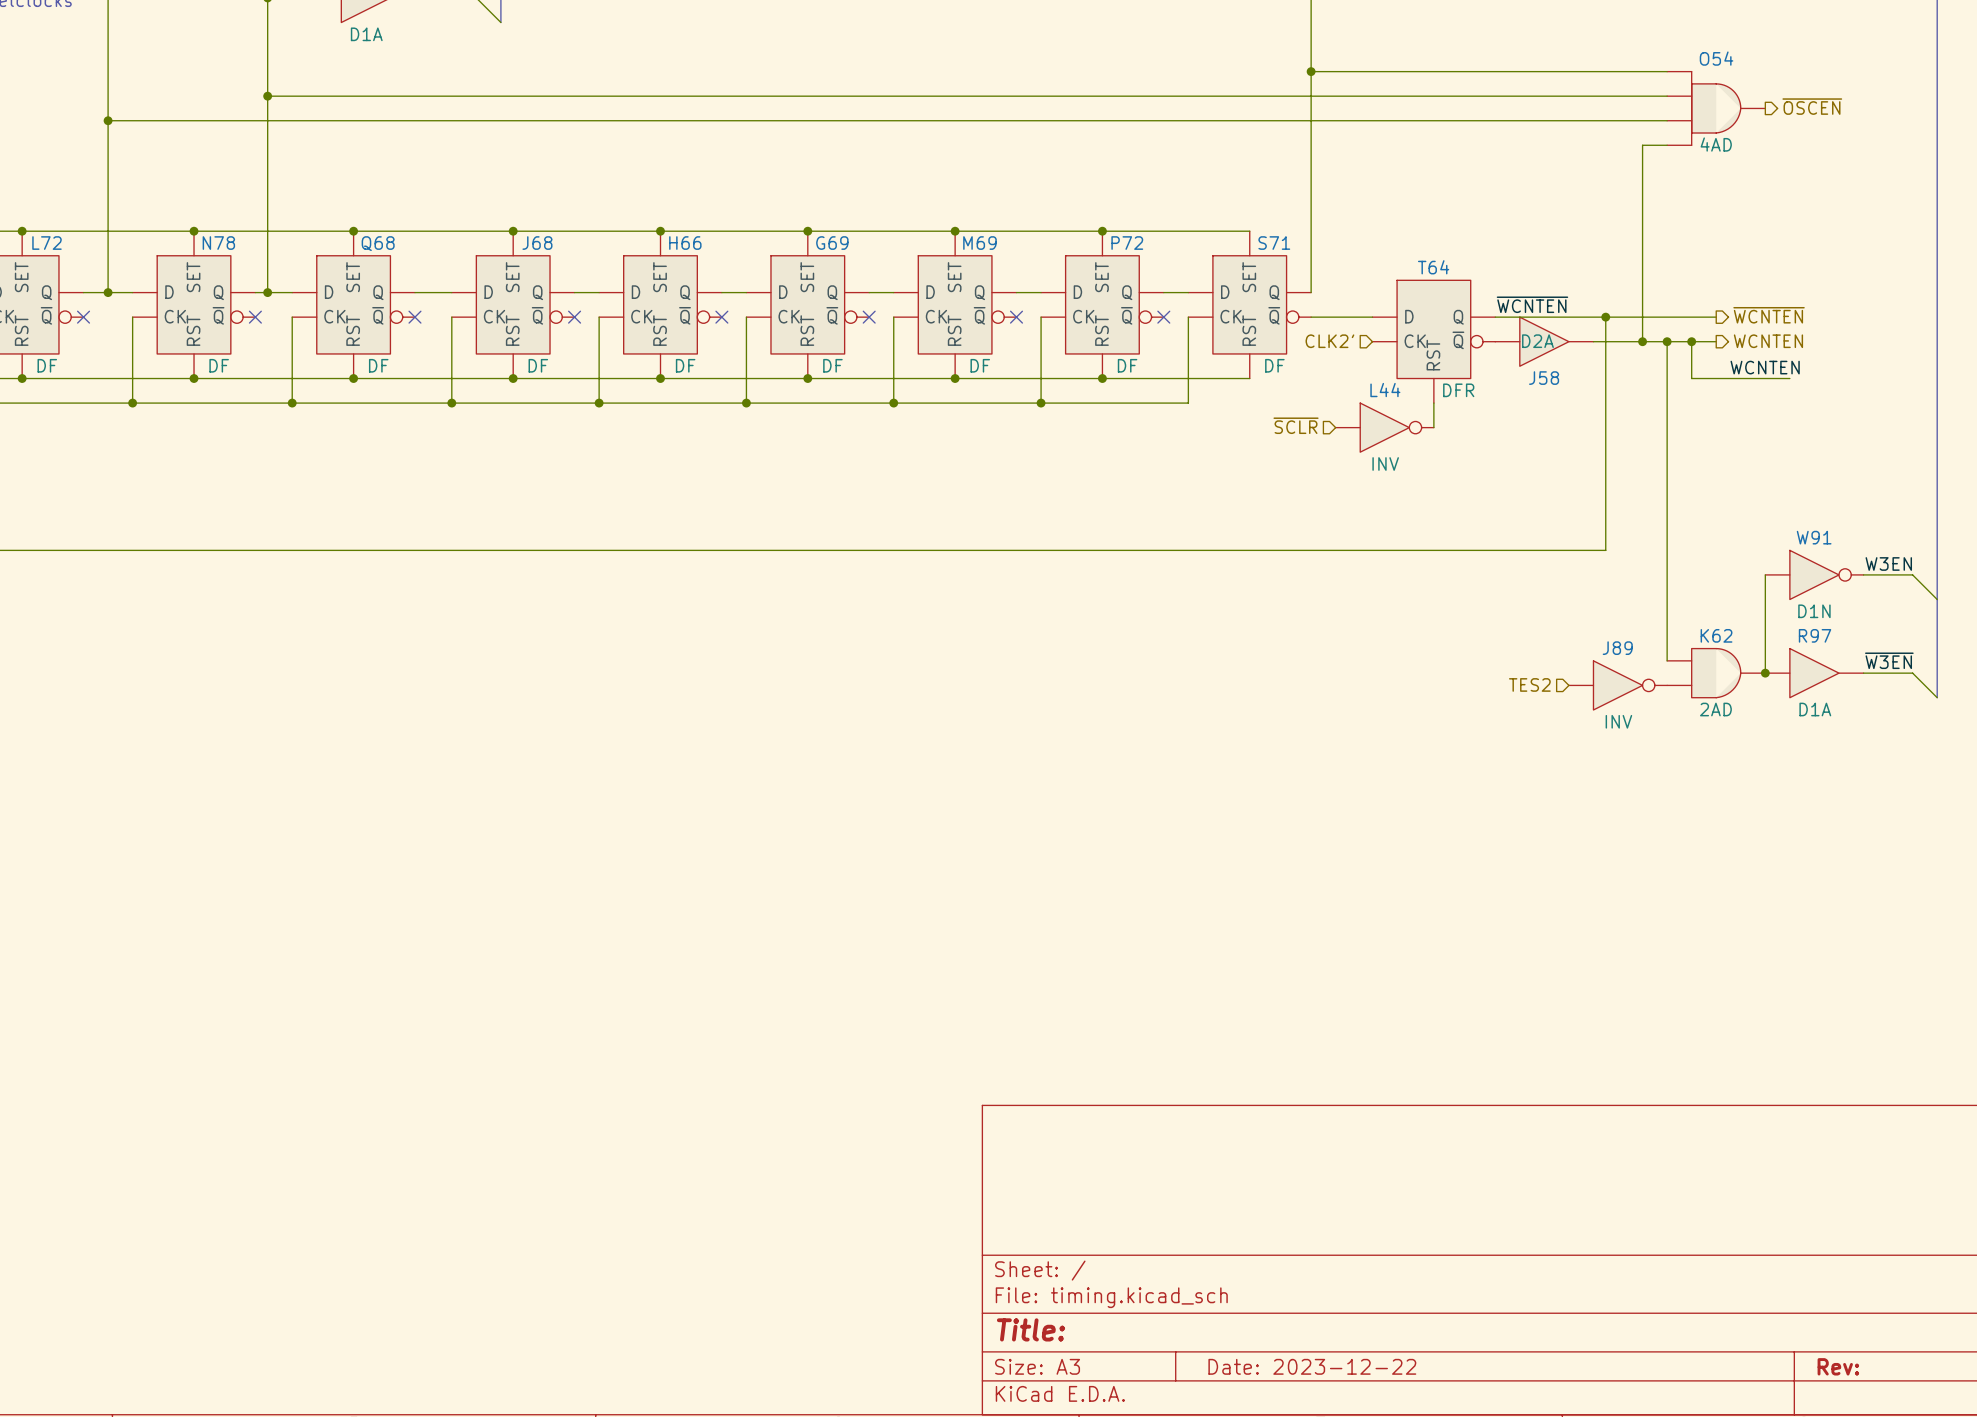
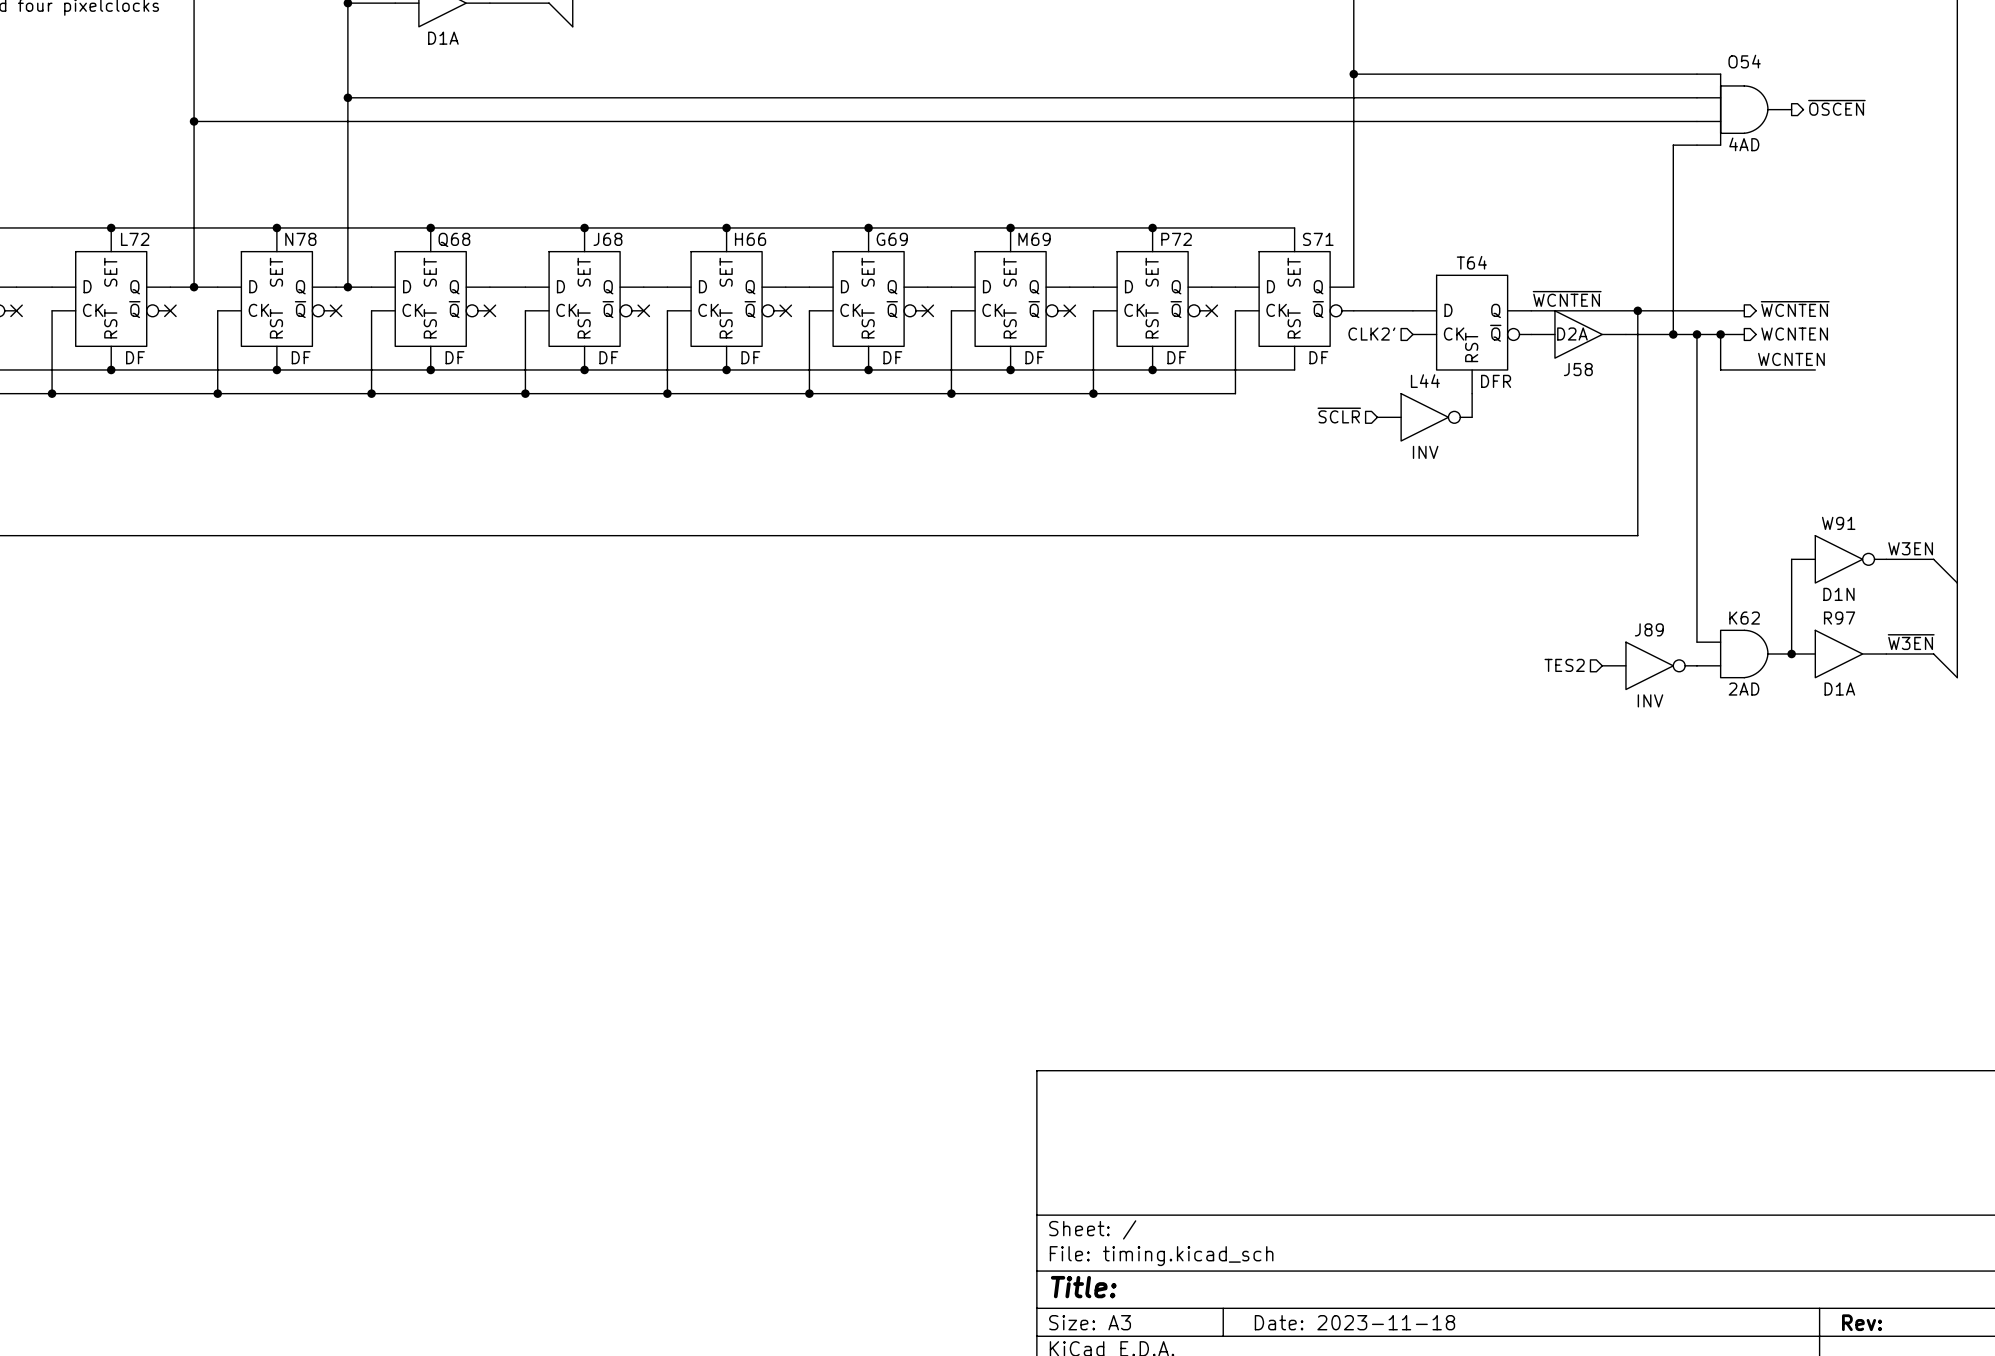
title block: Date: 2023-12-22 (1312, 1366) -> Date: 2023-11-18 (1354, 1322)

